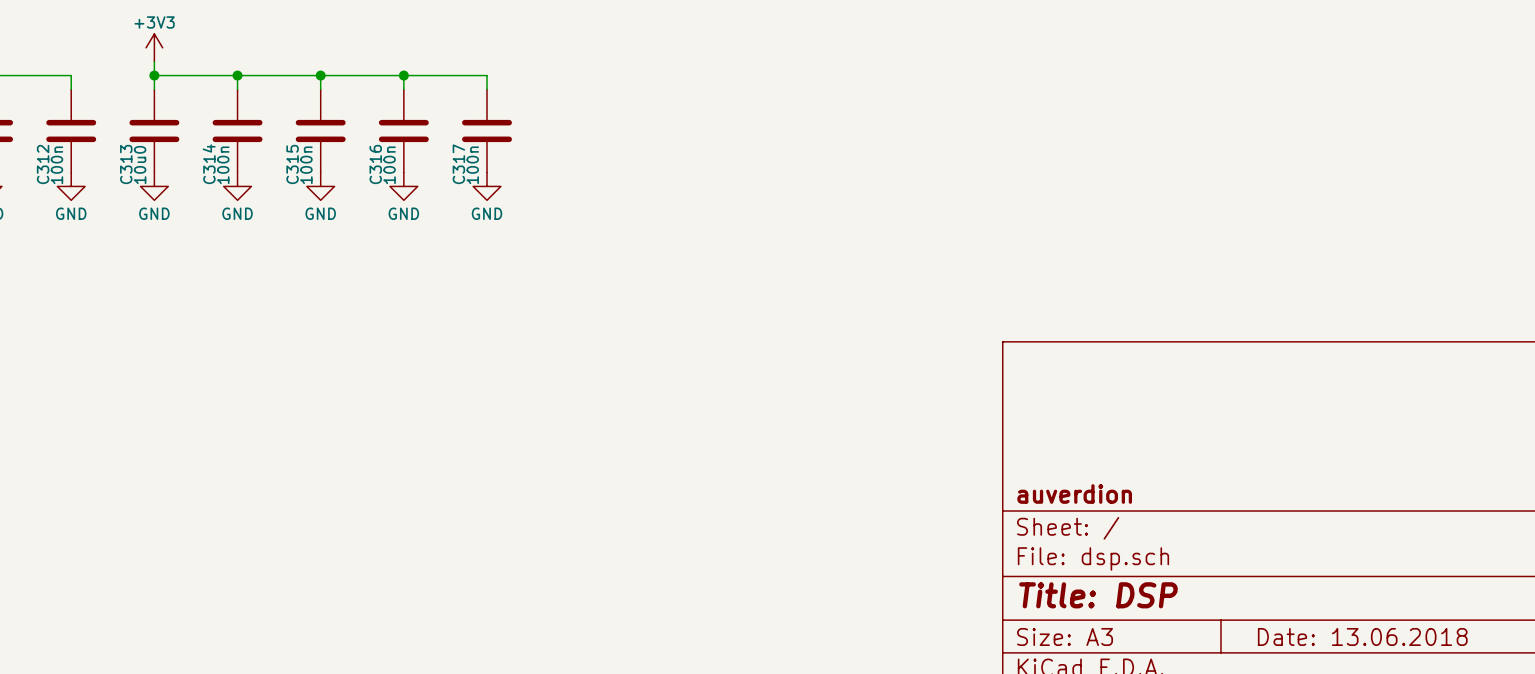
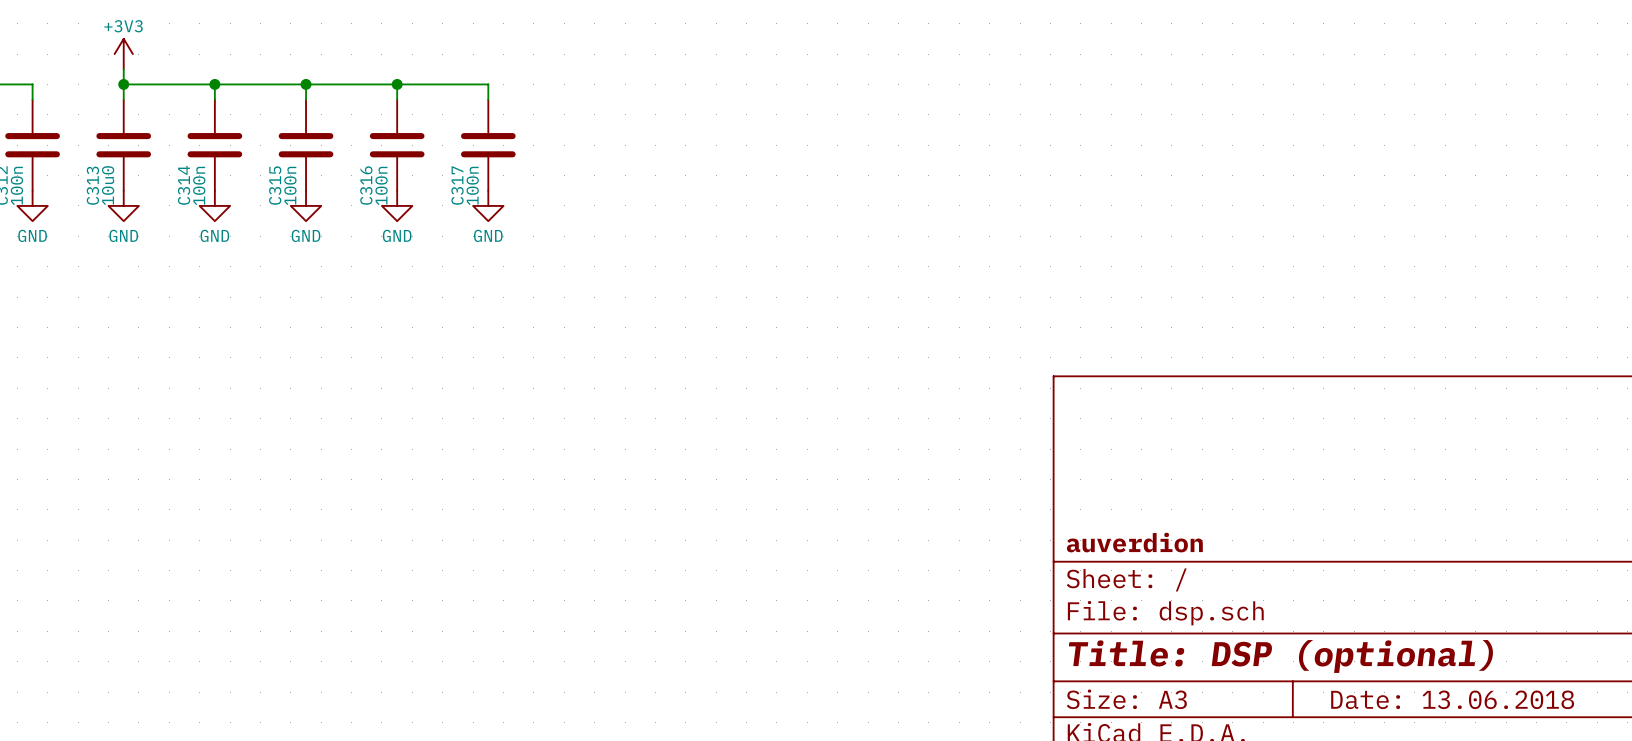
title block: Title: DSP (1098, 595) -> Title: DSP (optional) (1280, 656)

